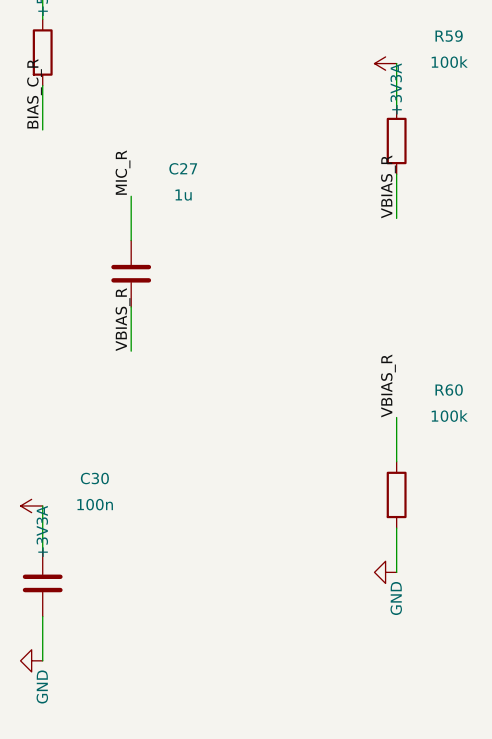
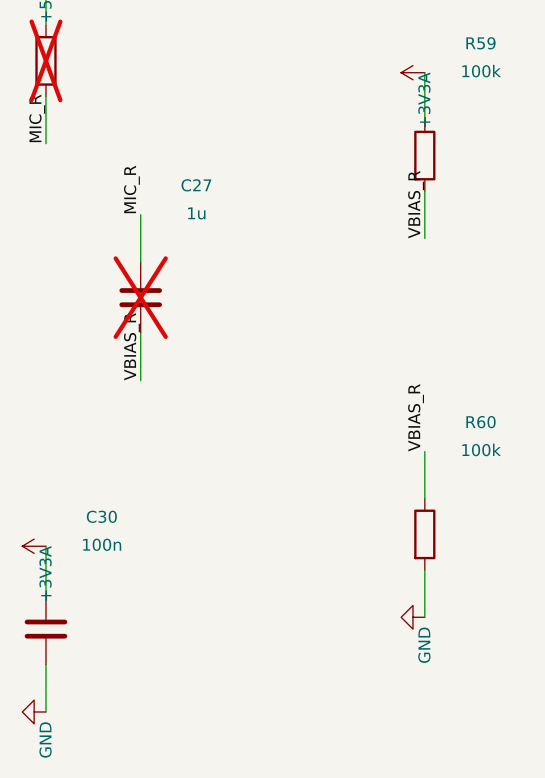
part do-not-place cross: none -> (45, 60)
label: BIAS_C_R (34, 93) -> MIC_R (37, 118)
C27 do-not-place cross: none -> (140, 297)

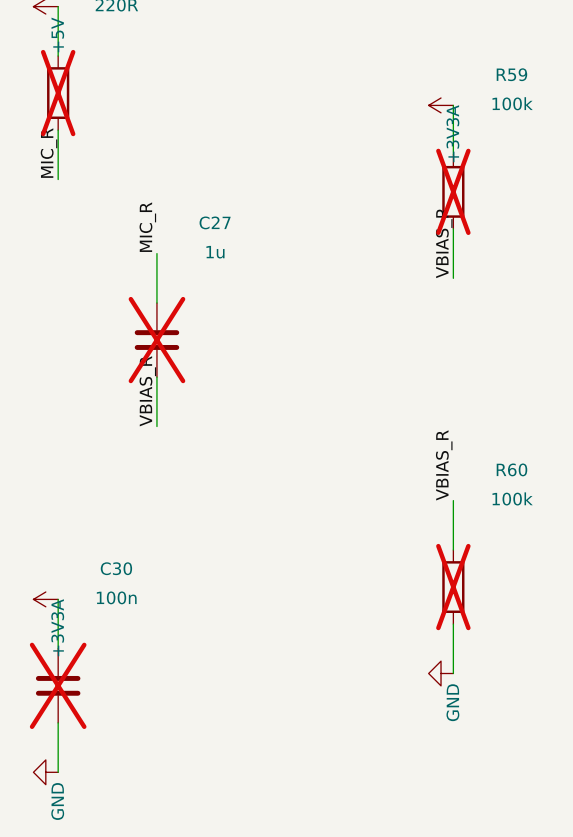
R59 do-not-place cross: none -> (453, 191)
R60 do-not-place cross: none -> (453, 587)
C30 do-not-place cross: none -> (58, 685)

